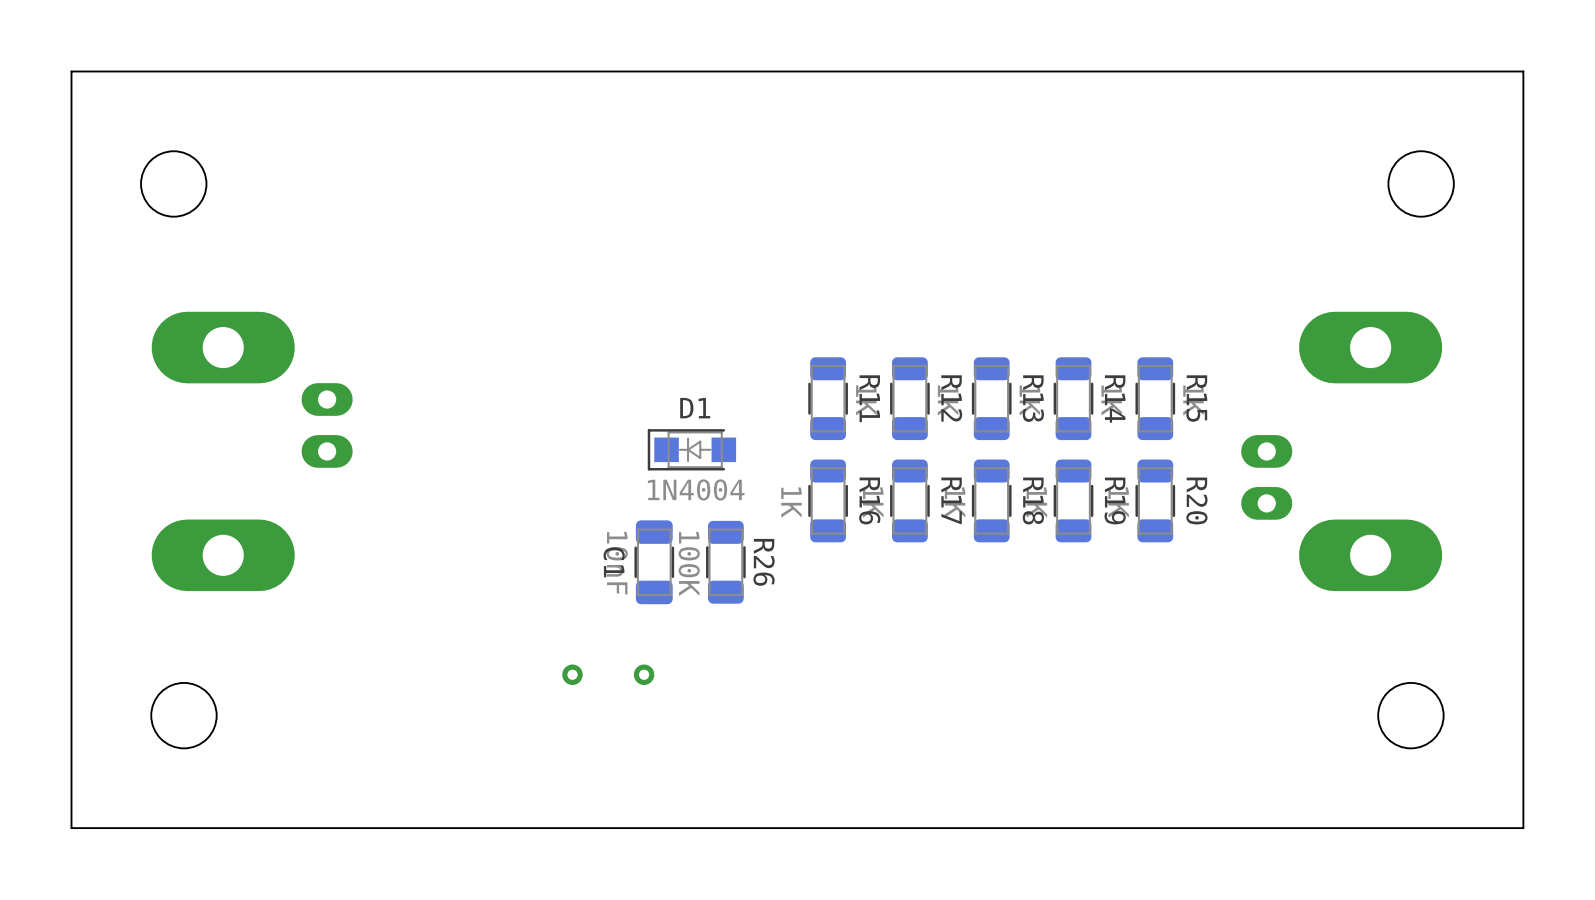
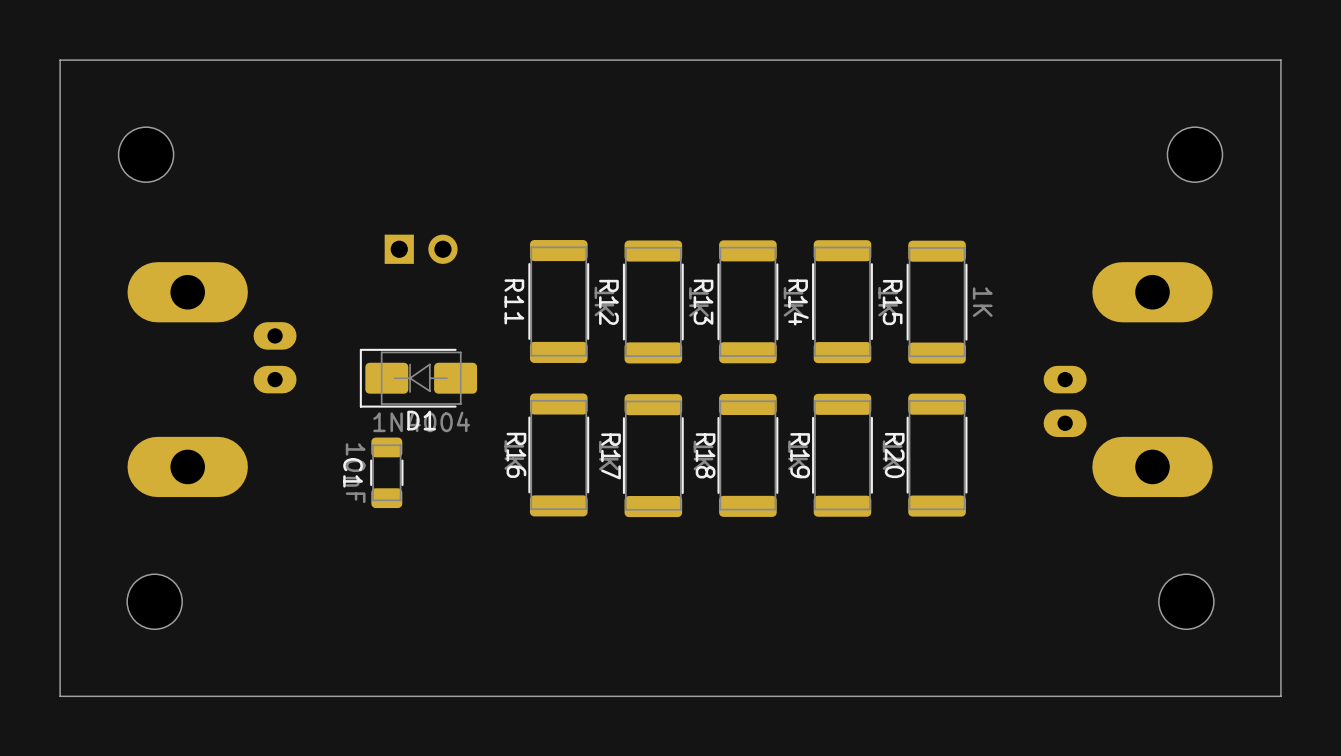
part: none -> (421, 249)
R11 footprint: [808, 357, 848, 441] -> [528, 240, 590, 363]
R12 footprint: [890, 357, 930, 441] -> [622, 240, 684, 364]
R13 footprint: [971, 357, 1012, 441] -> [717, 240, 779, 364]
R14 footprint: [1053, 357, 1094, 441] -> [812, 240, 873, 364]
R15 footprint: [1135, 357, 1176, 441] -> [906, 240, 968, 364]
R11 name position: R11 (869, 398) -> R11 (514, 301)
R12 name position: R12 (951, 398) -> R12 (608, 302)
R13 name position: R13 (1033, 398) -> R13 (703, 302)
R14 name position: R14 (1115, 398) -> R14 (798, 302)
R15 name position: R15 (1196, 398) -> R15 (892, 302)
D1 name position: D1 (695, 408) -> D1 (421, 420)
D1 footprint: [647, 429, 737, 471] -> [359, 348, 478, 408]
R16 footprint: [808, 459, 848, 543] -> [528, 393, 590, 517]
R17 footprint: [890, 459, 930, 543] -> [622, 394, 684, 518]
R18 footprint: [971, 459, 1012, 543] -> [717, 393, 779, 517]
R19 footprint: [1053, 459, 1094, 543] -> [812, 393, 873, 517]
R20 footprint: [1135, 459, 1176, 543] -> [906, 393, 968, 517]
R16 name position: R16 (869, 500) -> R16 (516, 455)
R17 name position: R17 (951, 500) -> R17 (610, 456)
R19 name position: R19 (1115, 500) -> R19 (800, 455)
R20 name position: R20 (1196, 500) -> R20 (894, 455)
R18 name position: R18 (1033, 501) -> R18 (705, 455)
C1 position: (654, 562) -> (386, 472)
R26: 100K (725, 562) -> none
part: (572, 674) -> none
part: (644, 674) -> none

